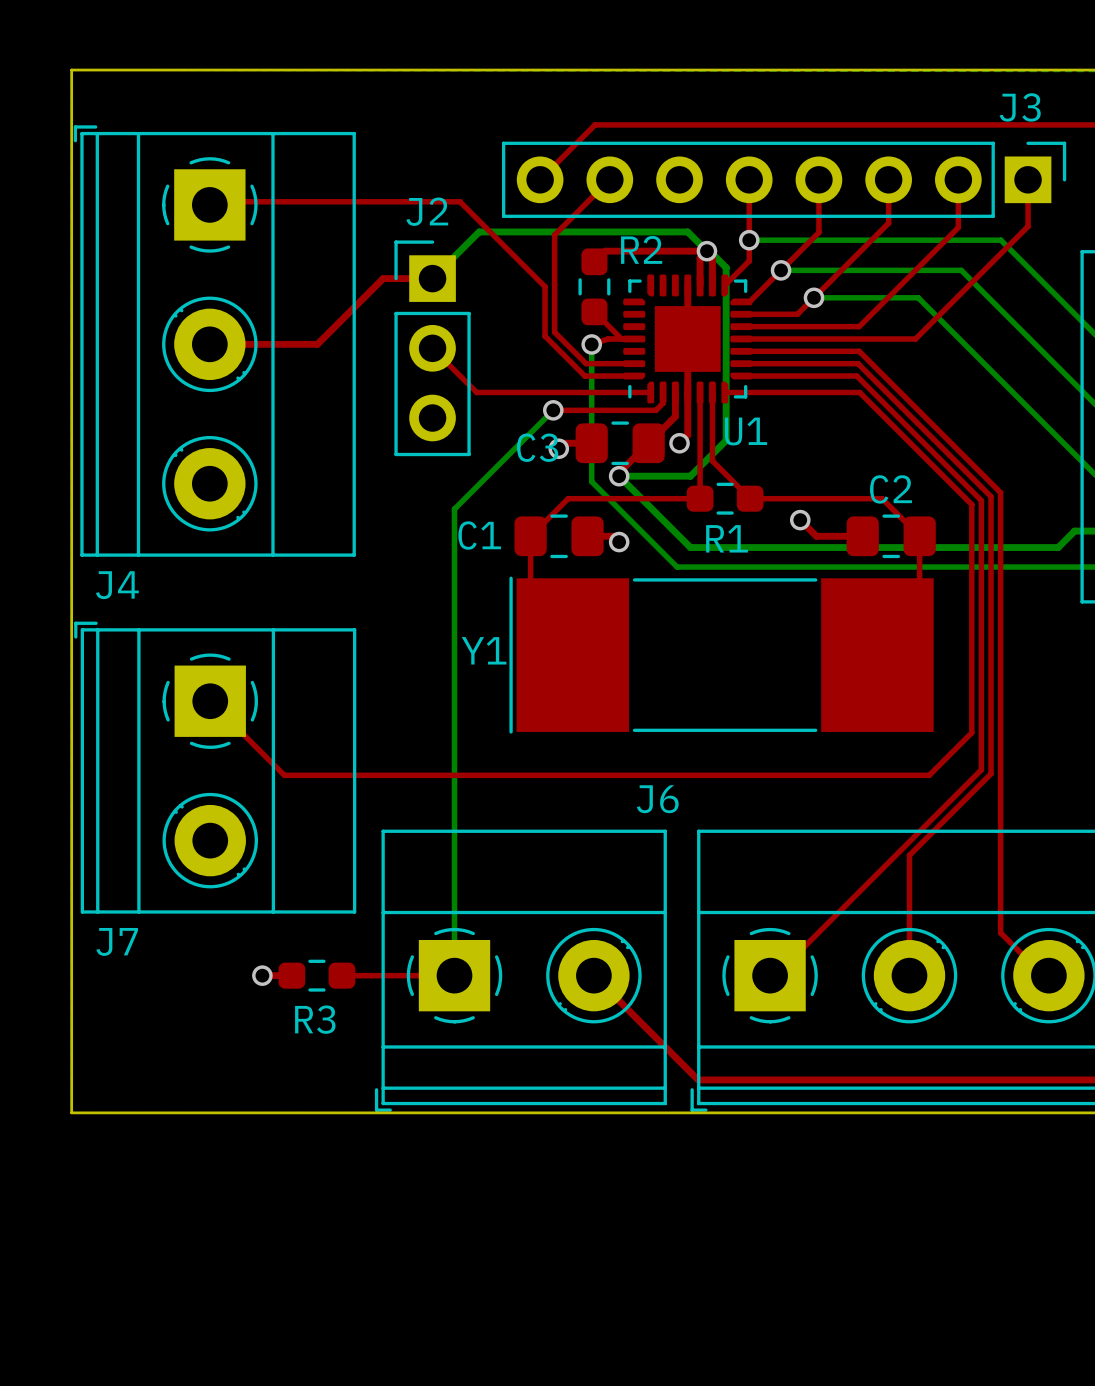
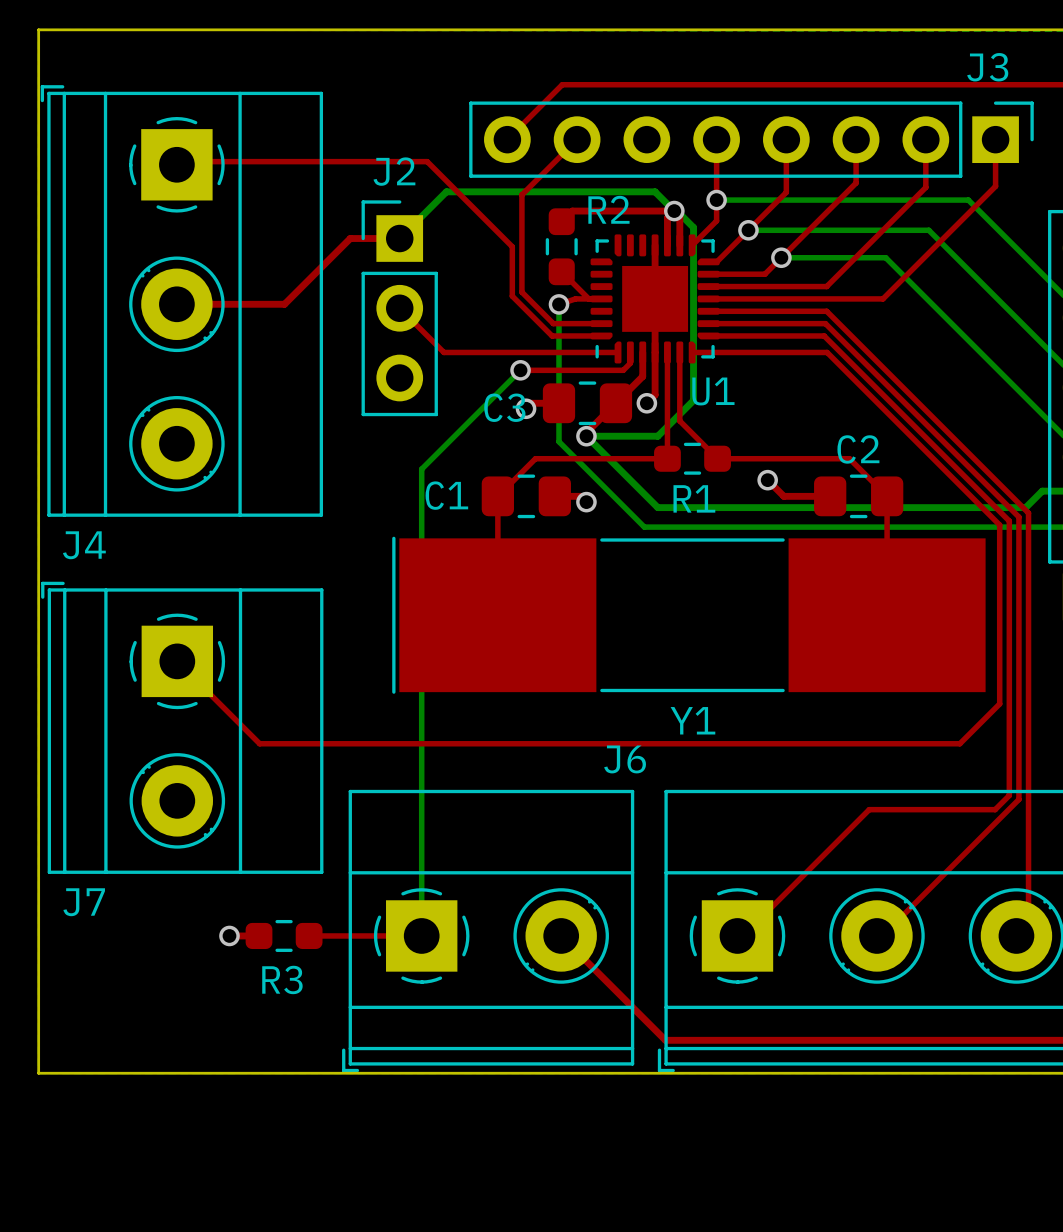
top track: (1000, 492) (1000, 932) (1048, 981) -> (968, 452) (1028, 513) (1028, 929) (1016, 941)
top track: (991, 496) (991, 773) (909, 855) (909, 981) -> (958, 456) (1018, 517) (1018, 799) (876, 941)
top track: (981, 500) (981, 769) (901, 849) -> (948, 460) (1009, 521) (1009, 795) (995, 809) (869, 809)
top track: (971, 504) (971, 732) (929, 775) (284, 775) -> (939, 464) (999, 525) (999, 703) (959, 743) (259, 743) (251, 735)
Y1 footprint: [509, 576, 934, 734] -> [392, 536, 986, 694]
Y1 name position: Y1 (484, 650) -> Y1 (692, 720)

